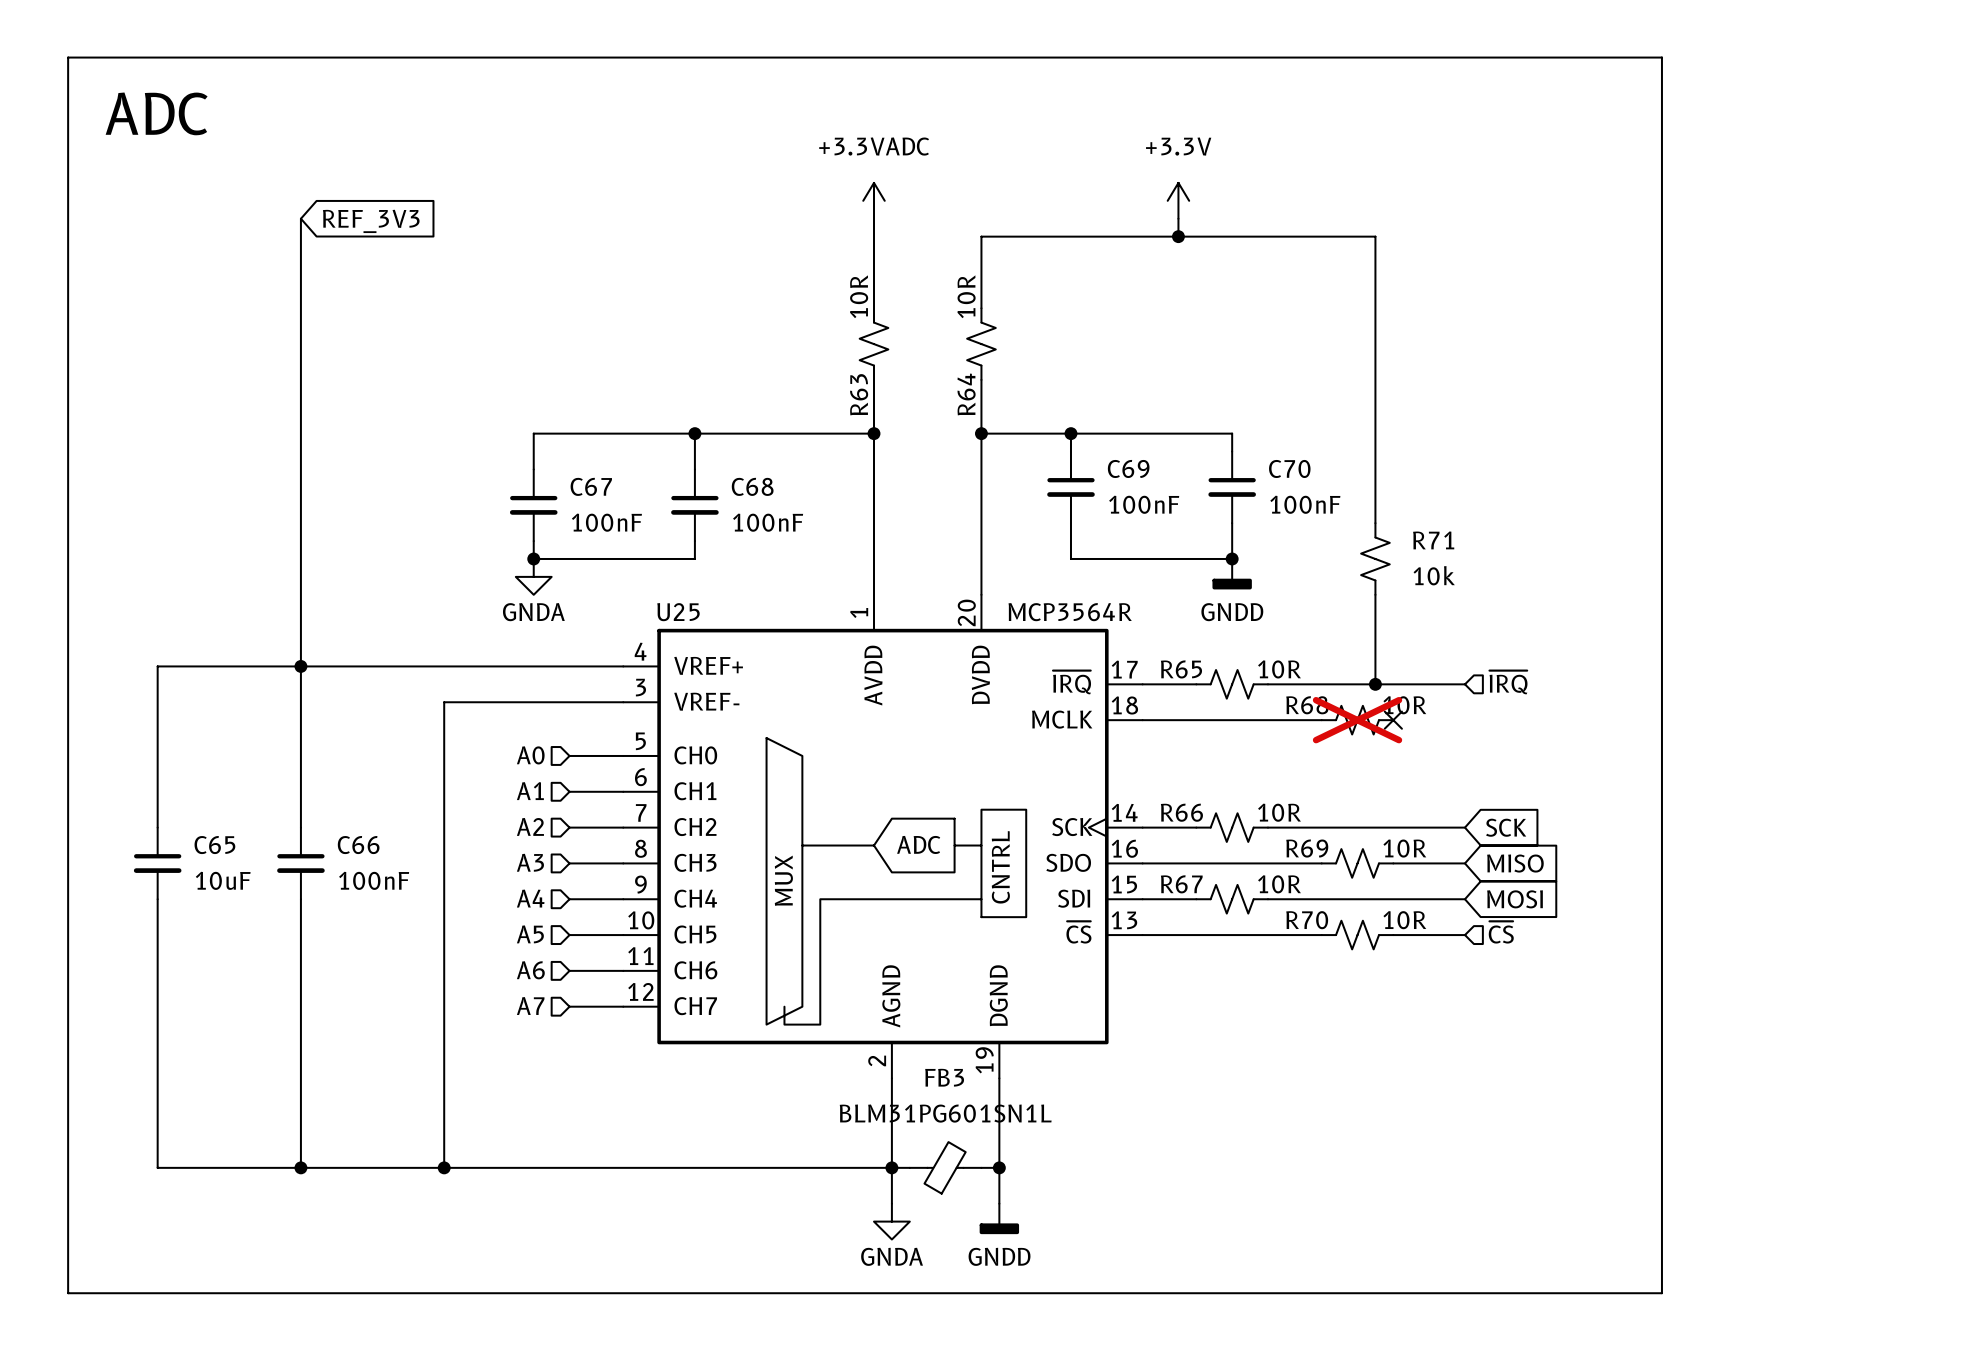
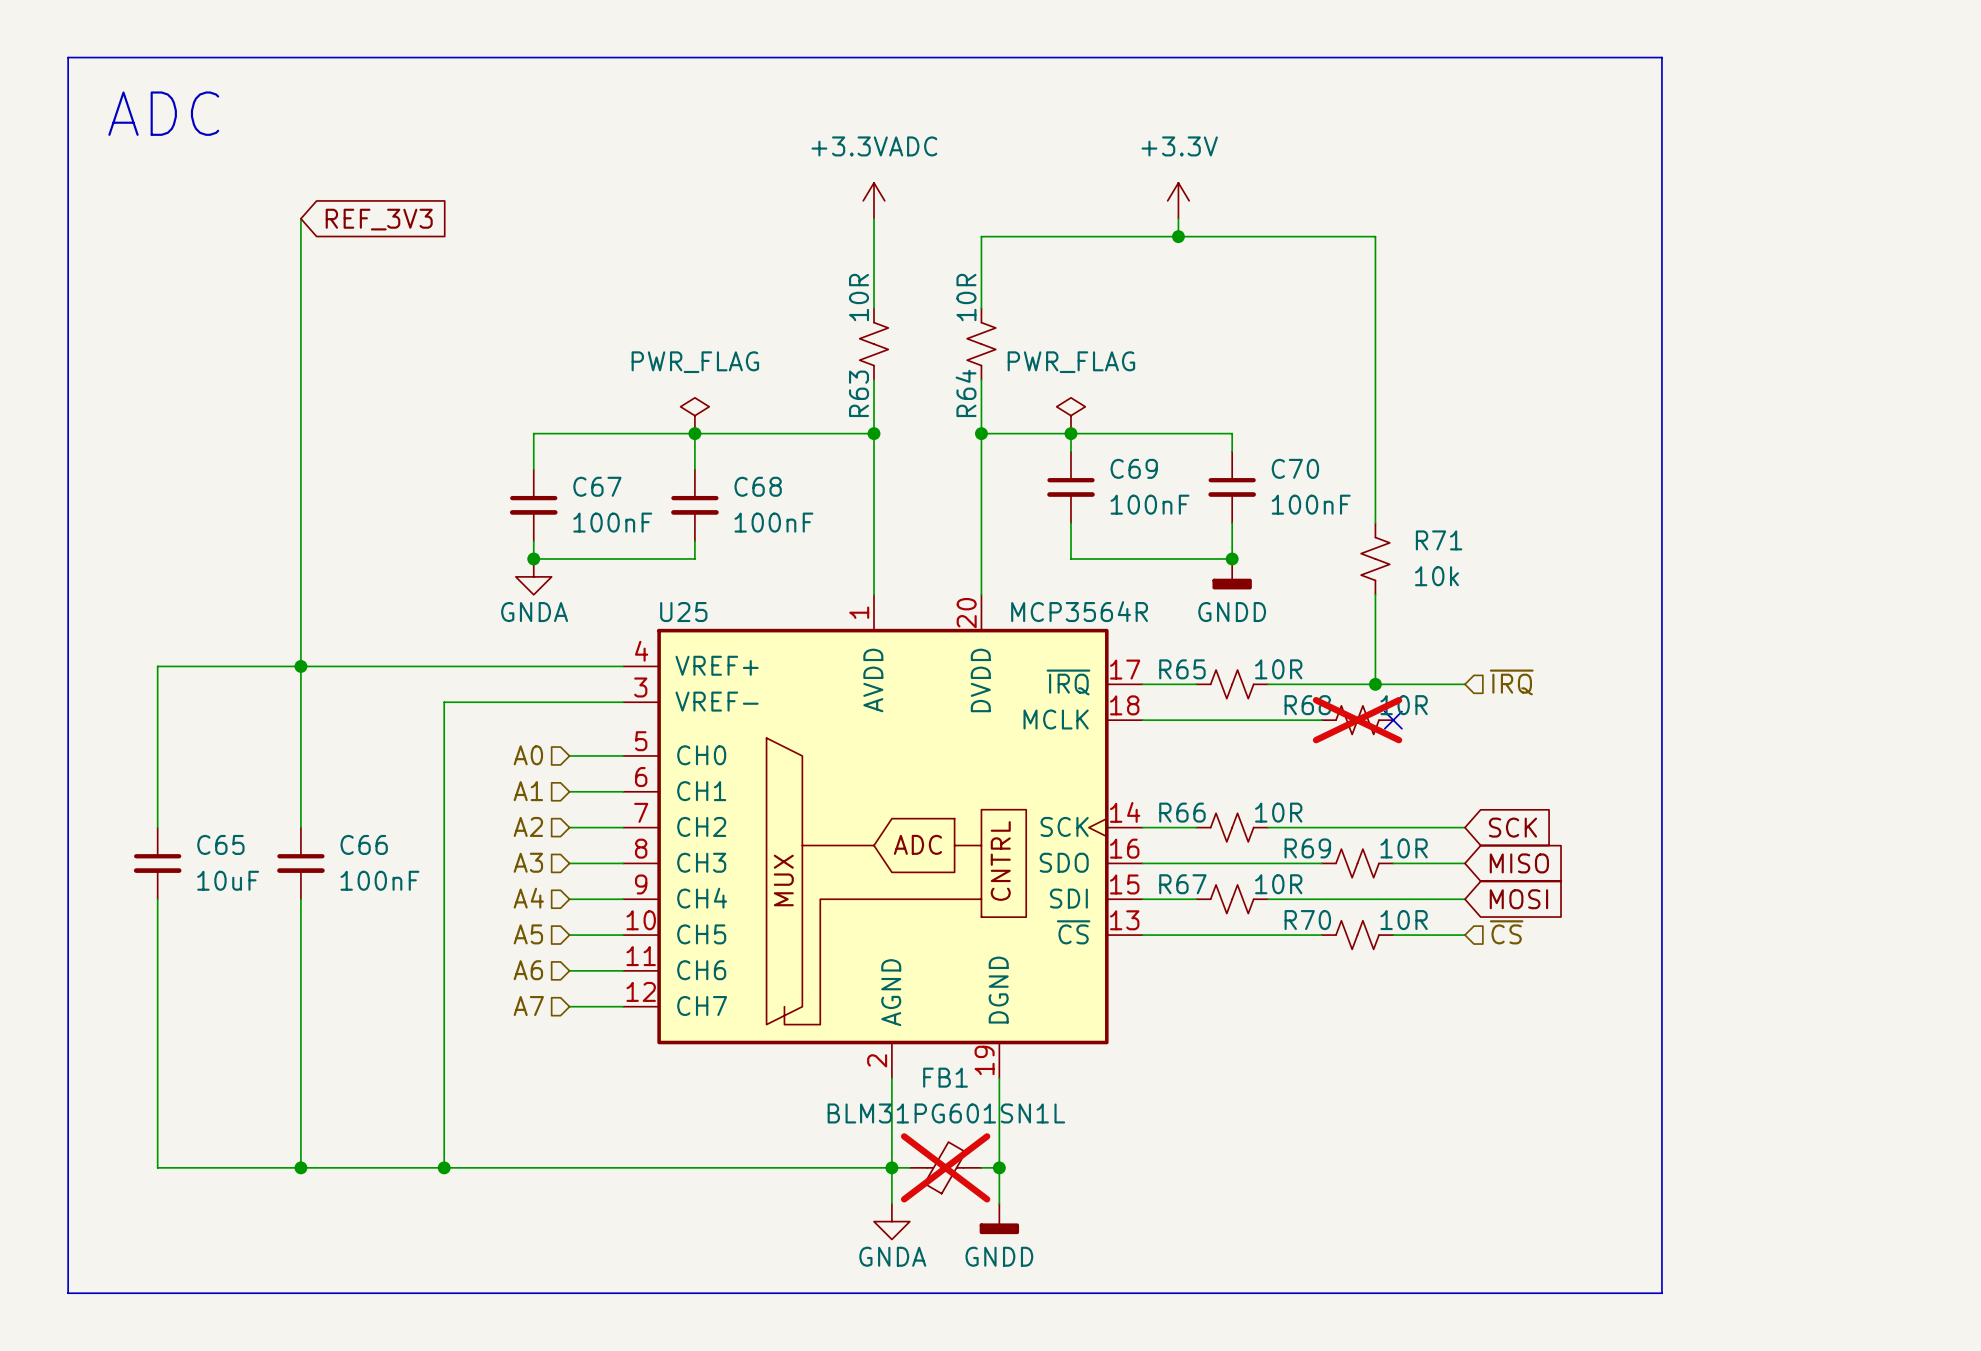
power symbol: none -> PWR_FLAG (694, 415)
power symbol: none -> PWR_FLAG (1070, 415)
FB3 name: FB3 (944, 1077) -> FB1 (945, 1077)
FB3 do-not-place cross: none -> (945, 1167)

